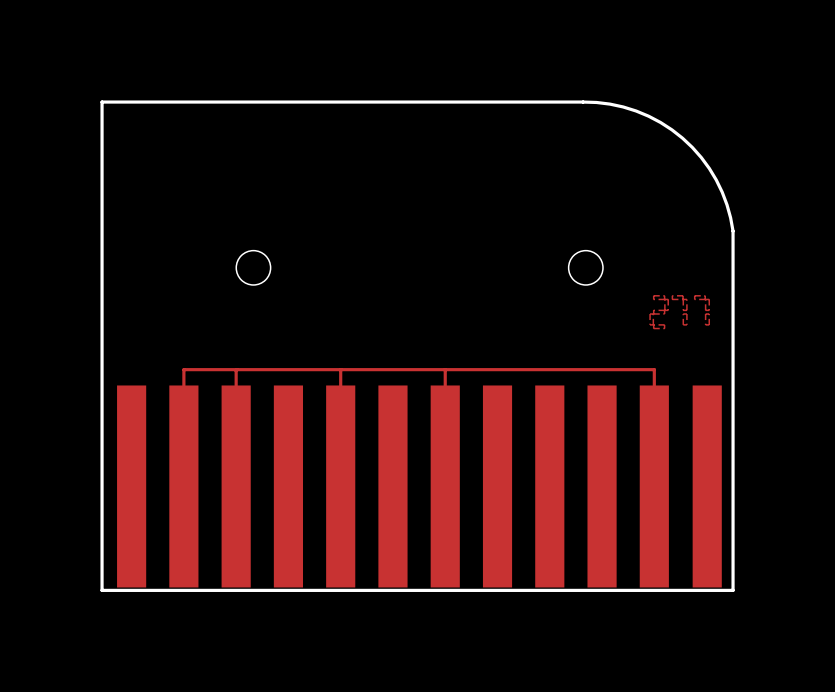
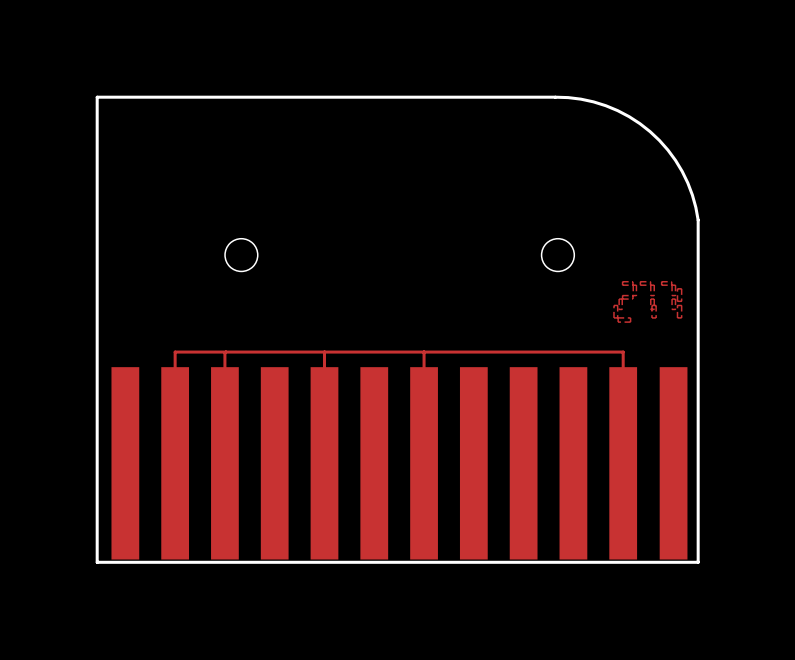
top zone outline: none -> (677, 288) (677, 301) (681, 301) (681, 288) (677, 288)
top zone outline: none -> (613, 305) (613, 317) (617, 317) (617, 305) (613, 305)
top zone outline: none -> (651, 305) (656, 305) (656, 317) (651, 317) (651, 305)
top zone outline: none -> (677, 305) (681, 305) (681, 317) (677, 317) (677, 305)
top zone outline: (653, 324) (653, 328) (664, 328) (664, 324) (653, 324) -> none
top zone outline: none -> (618, 317) (630, 317) (630, 322) (618, 322) (618, 317)

